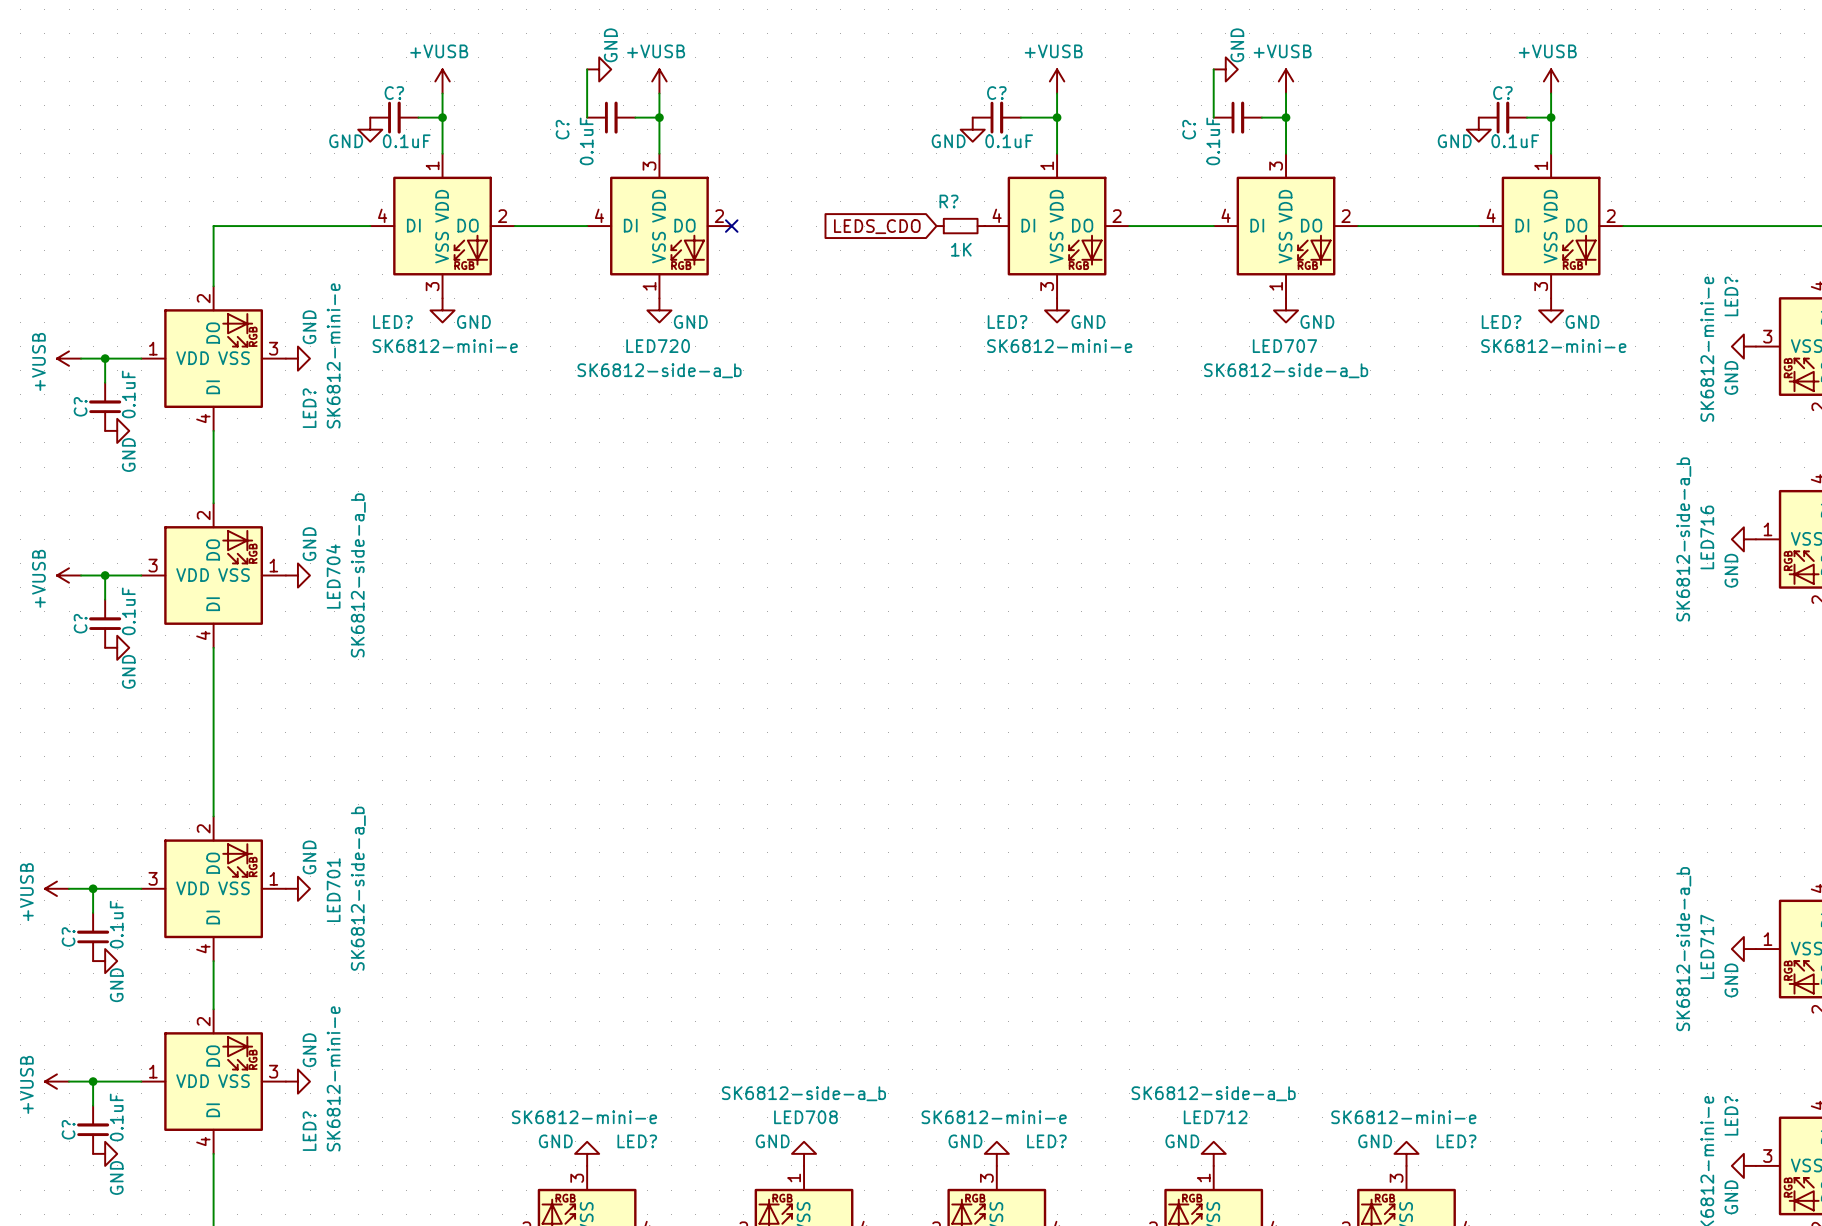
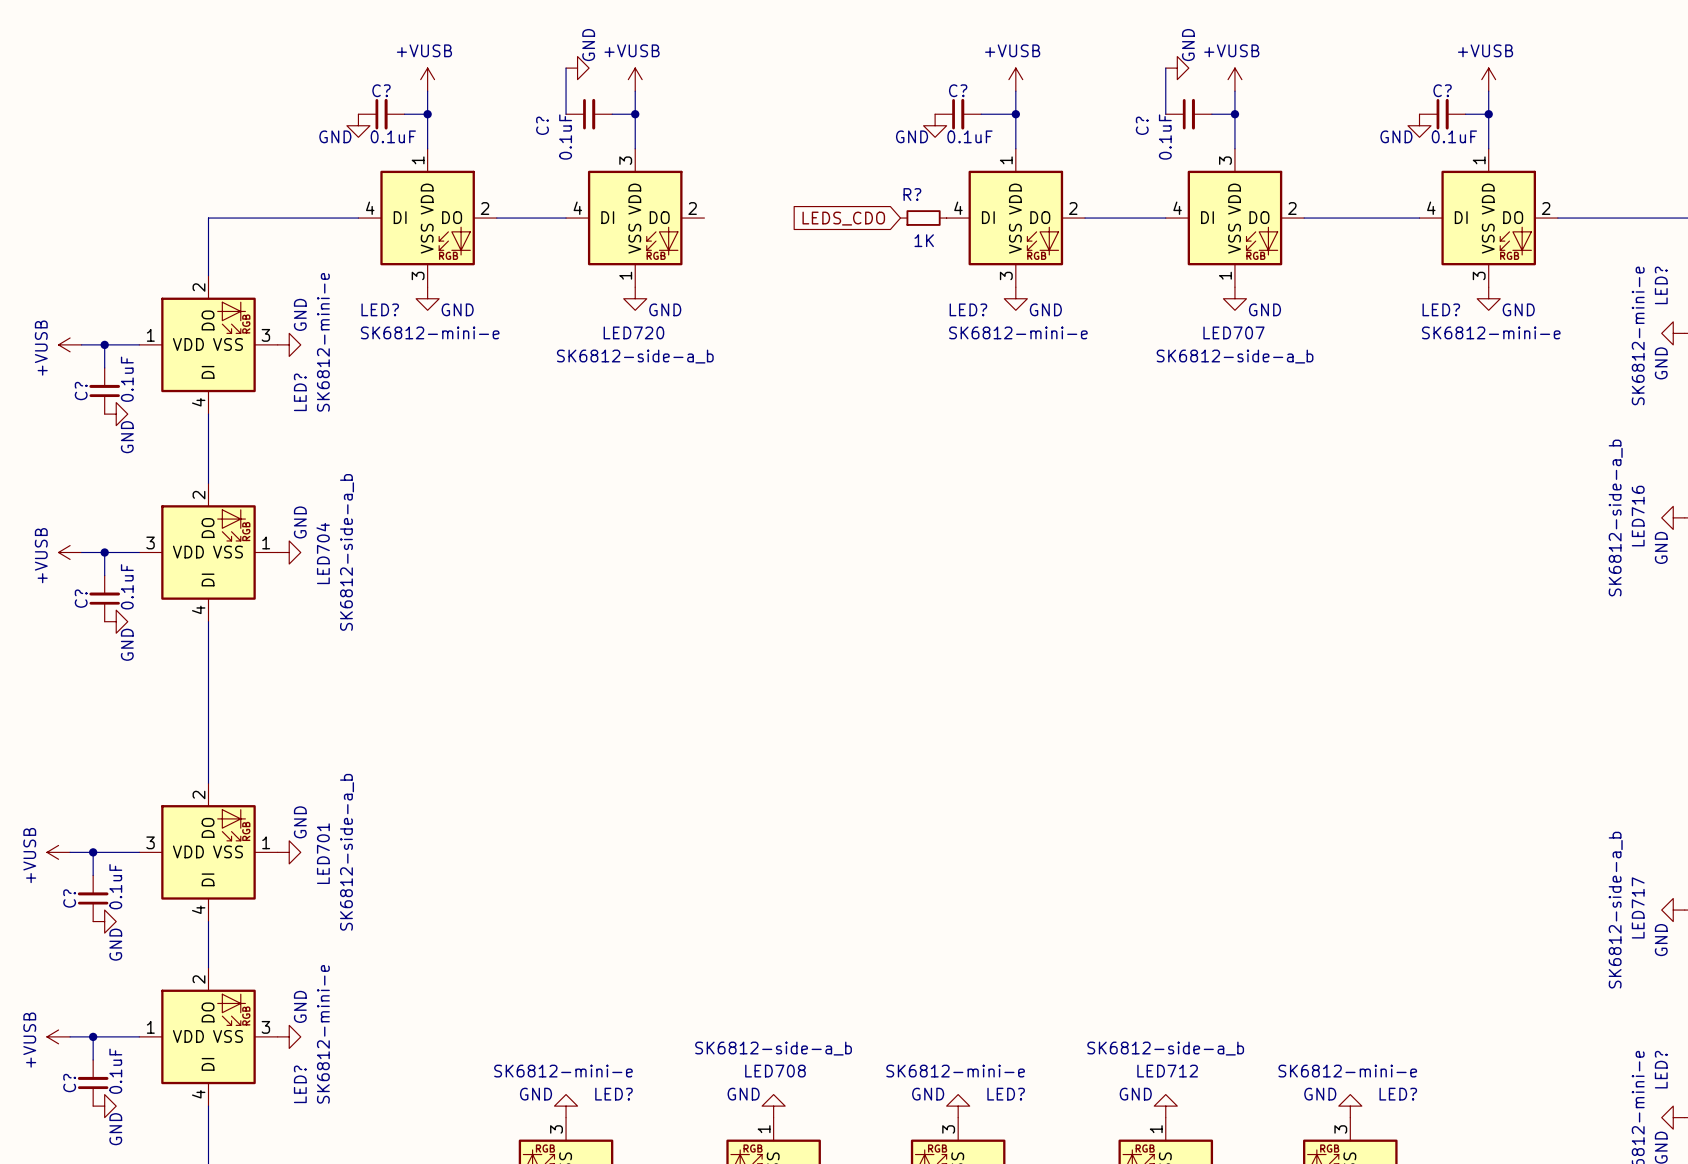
no-connect mark: (731, 226) -> none

